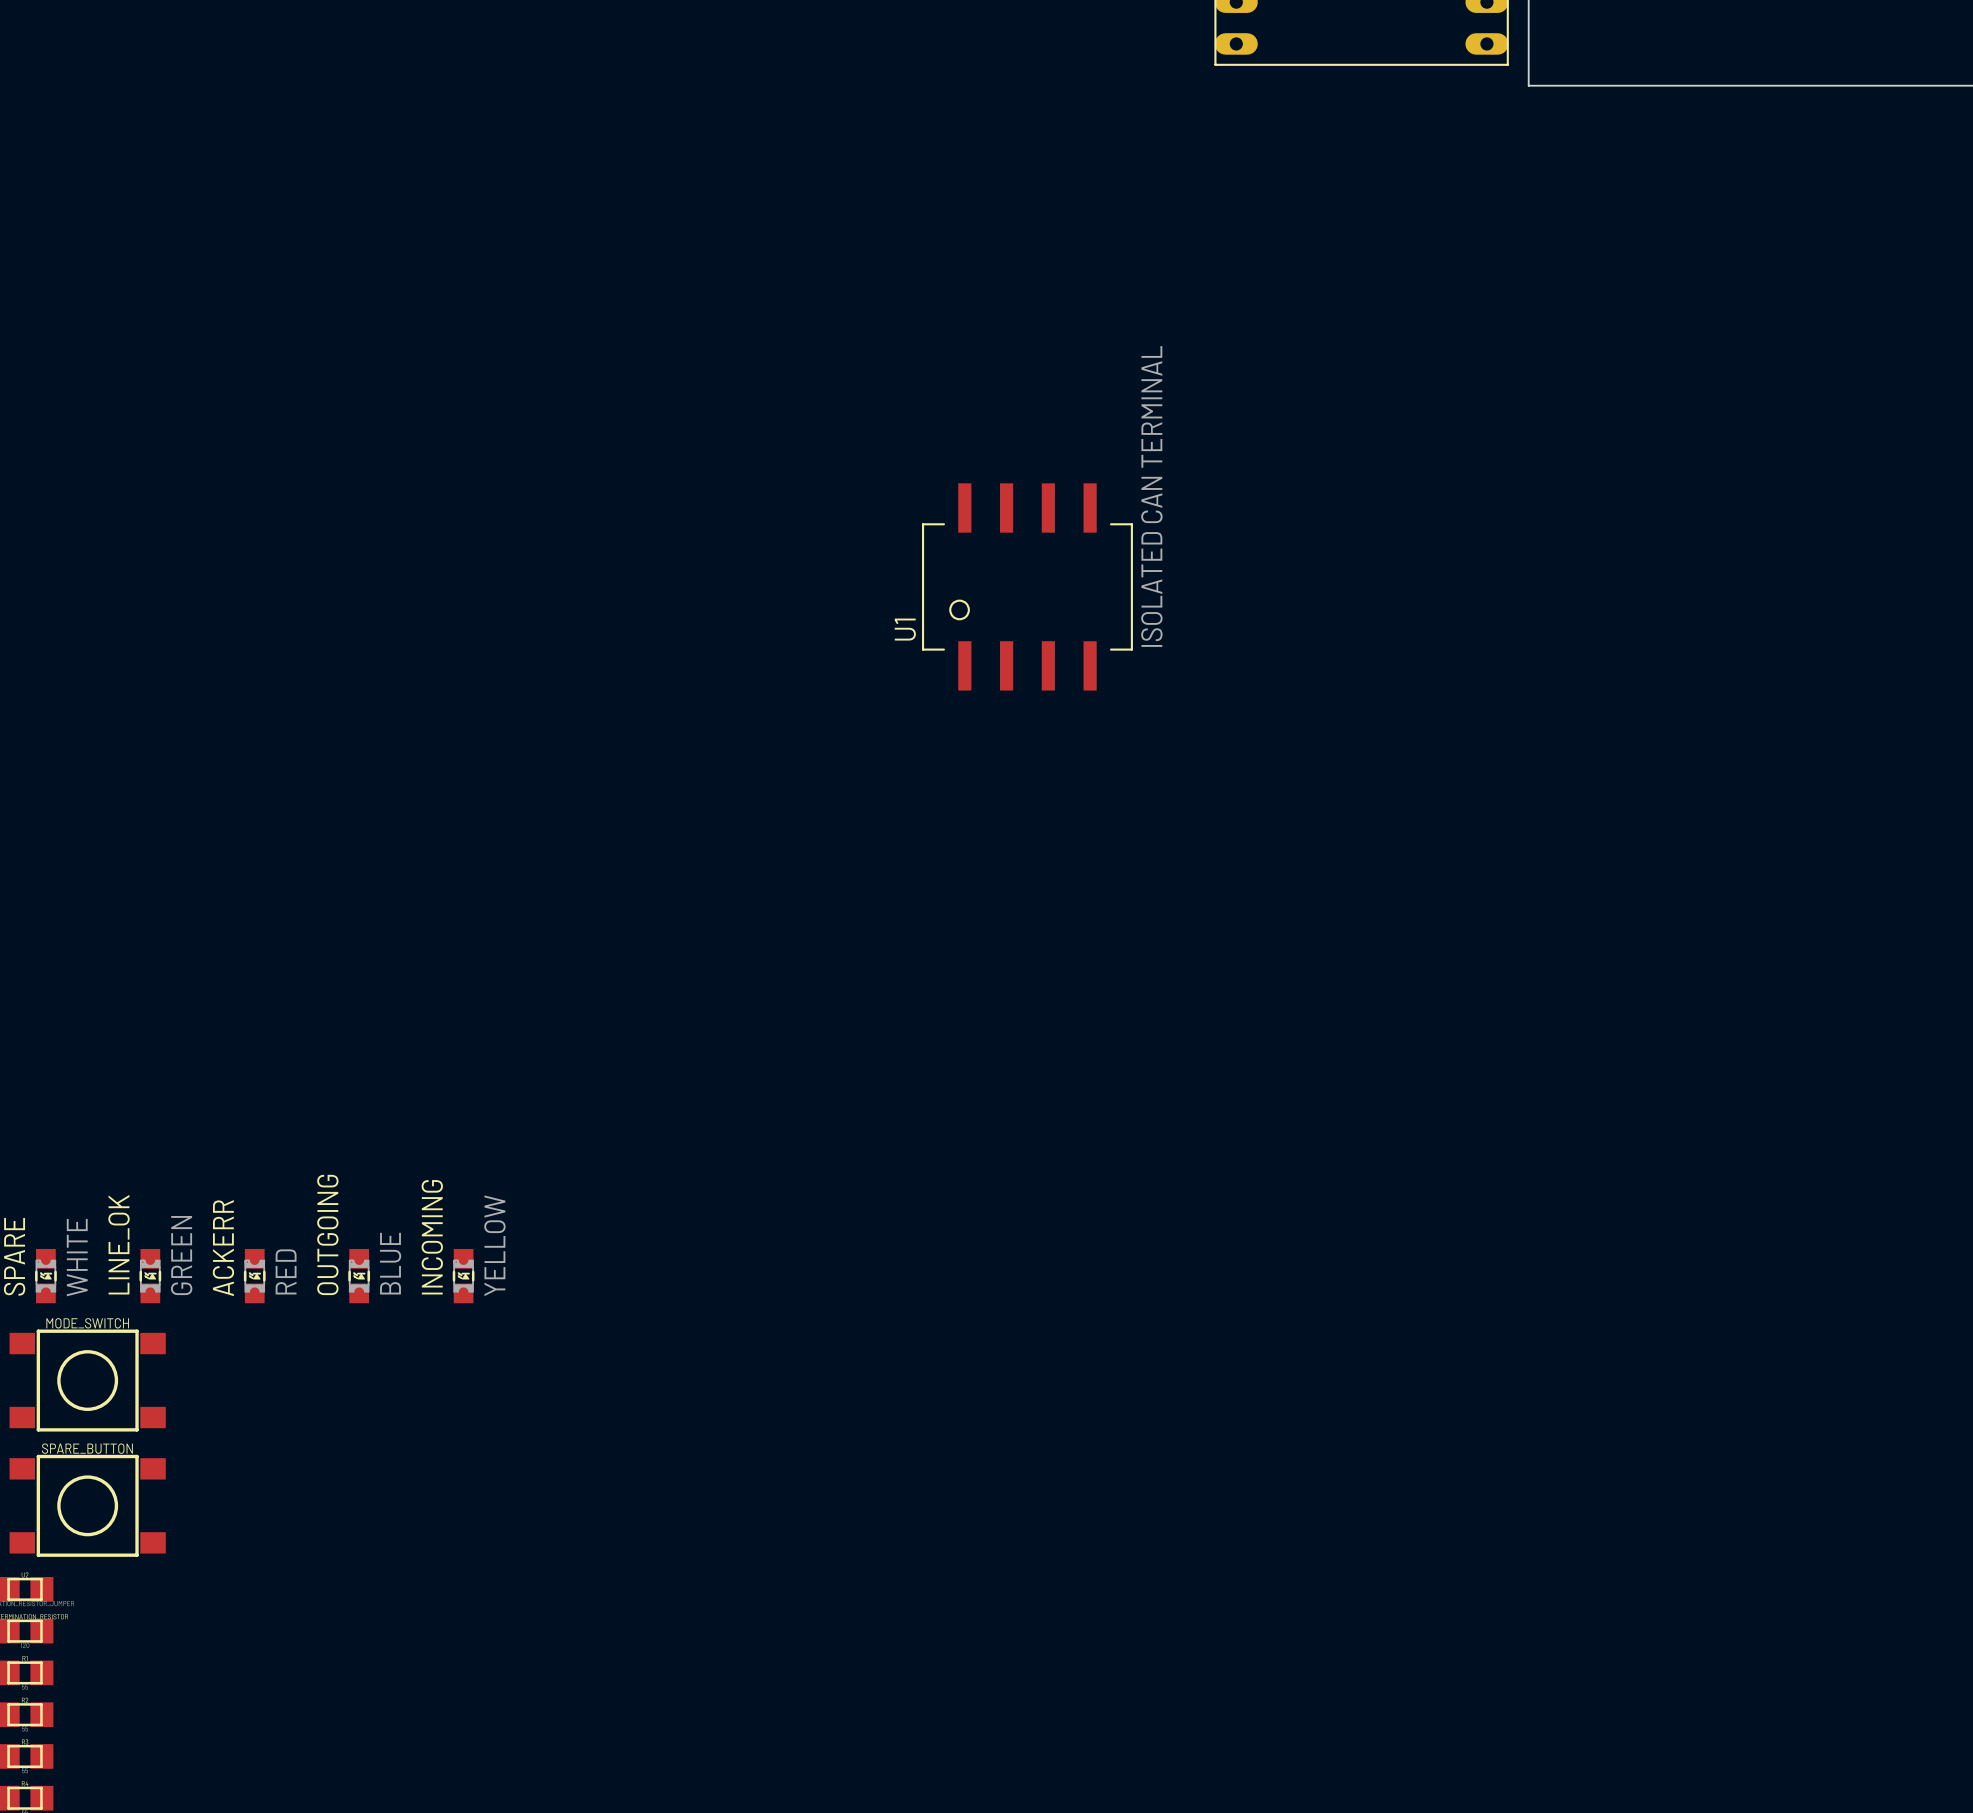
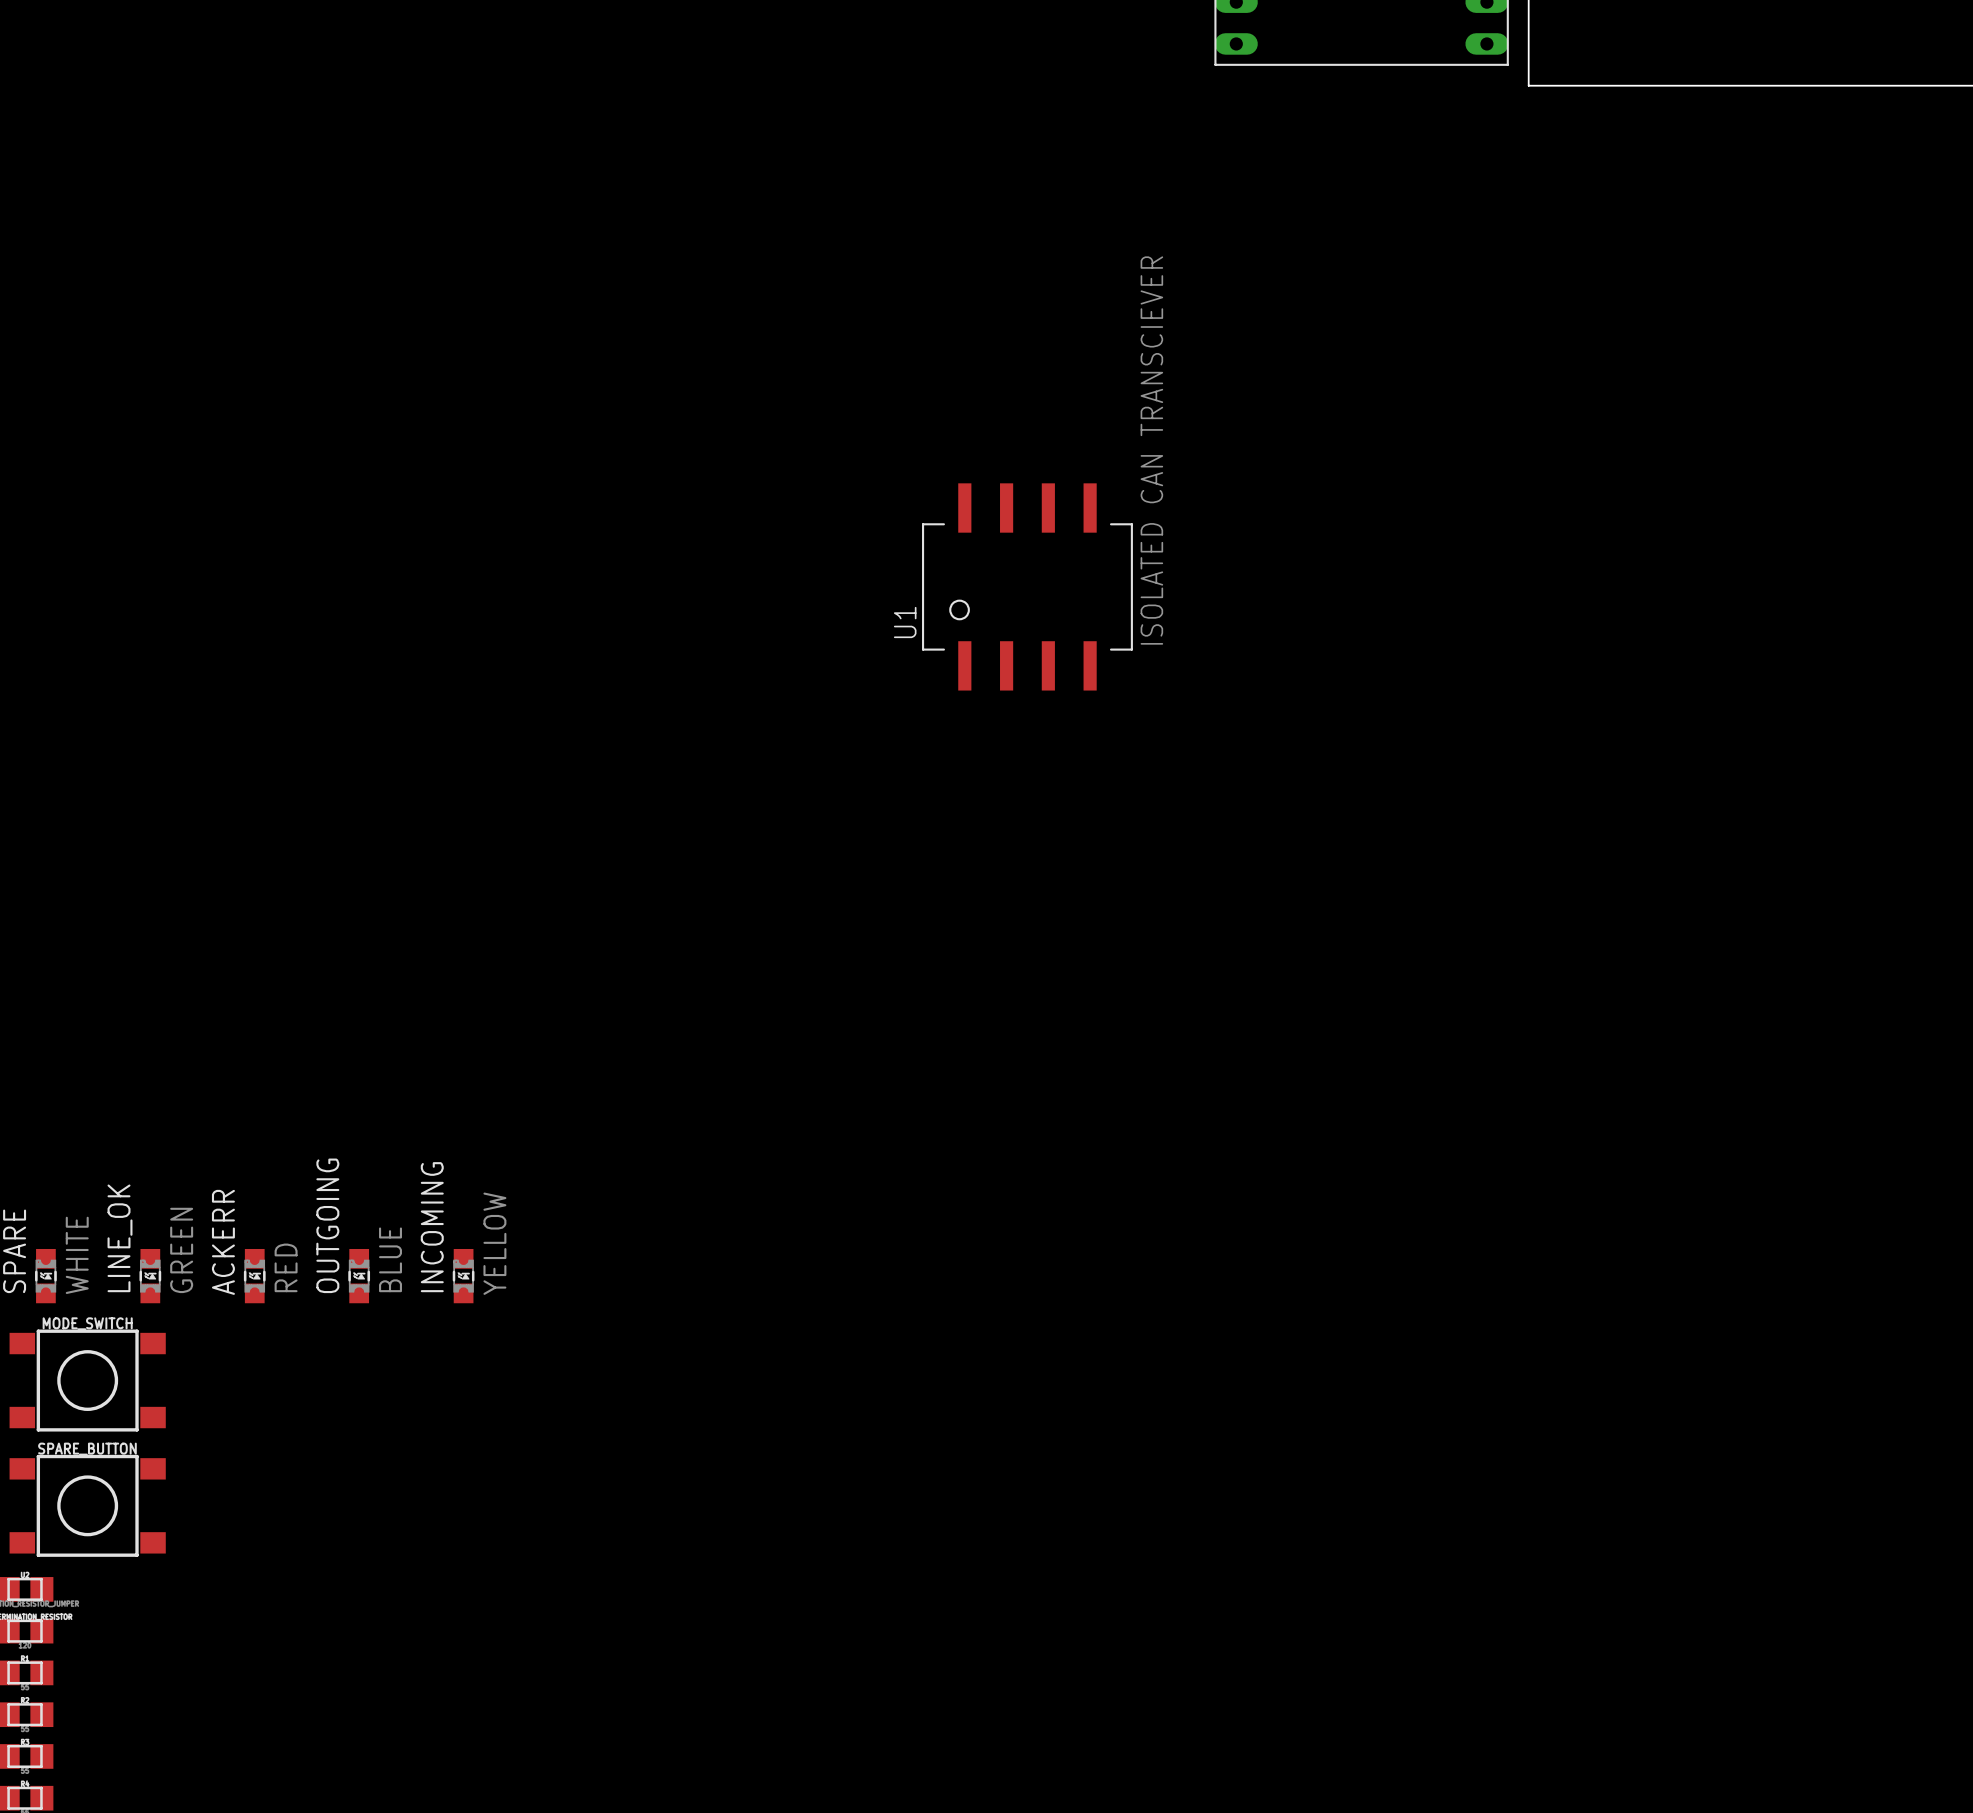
U1 value: ISOLATED CAN TERMINAL (1151, 496) -> ISOLATED CAN TRANSCIEVER (1151, 450)

